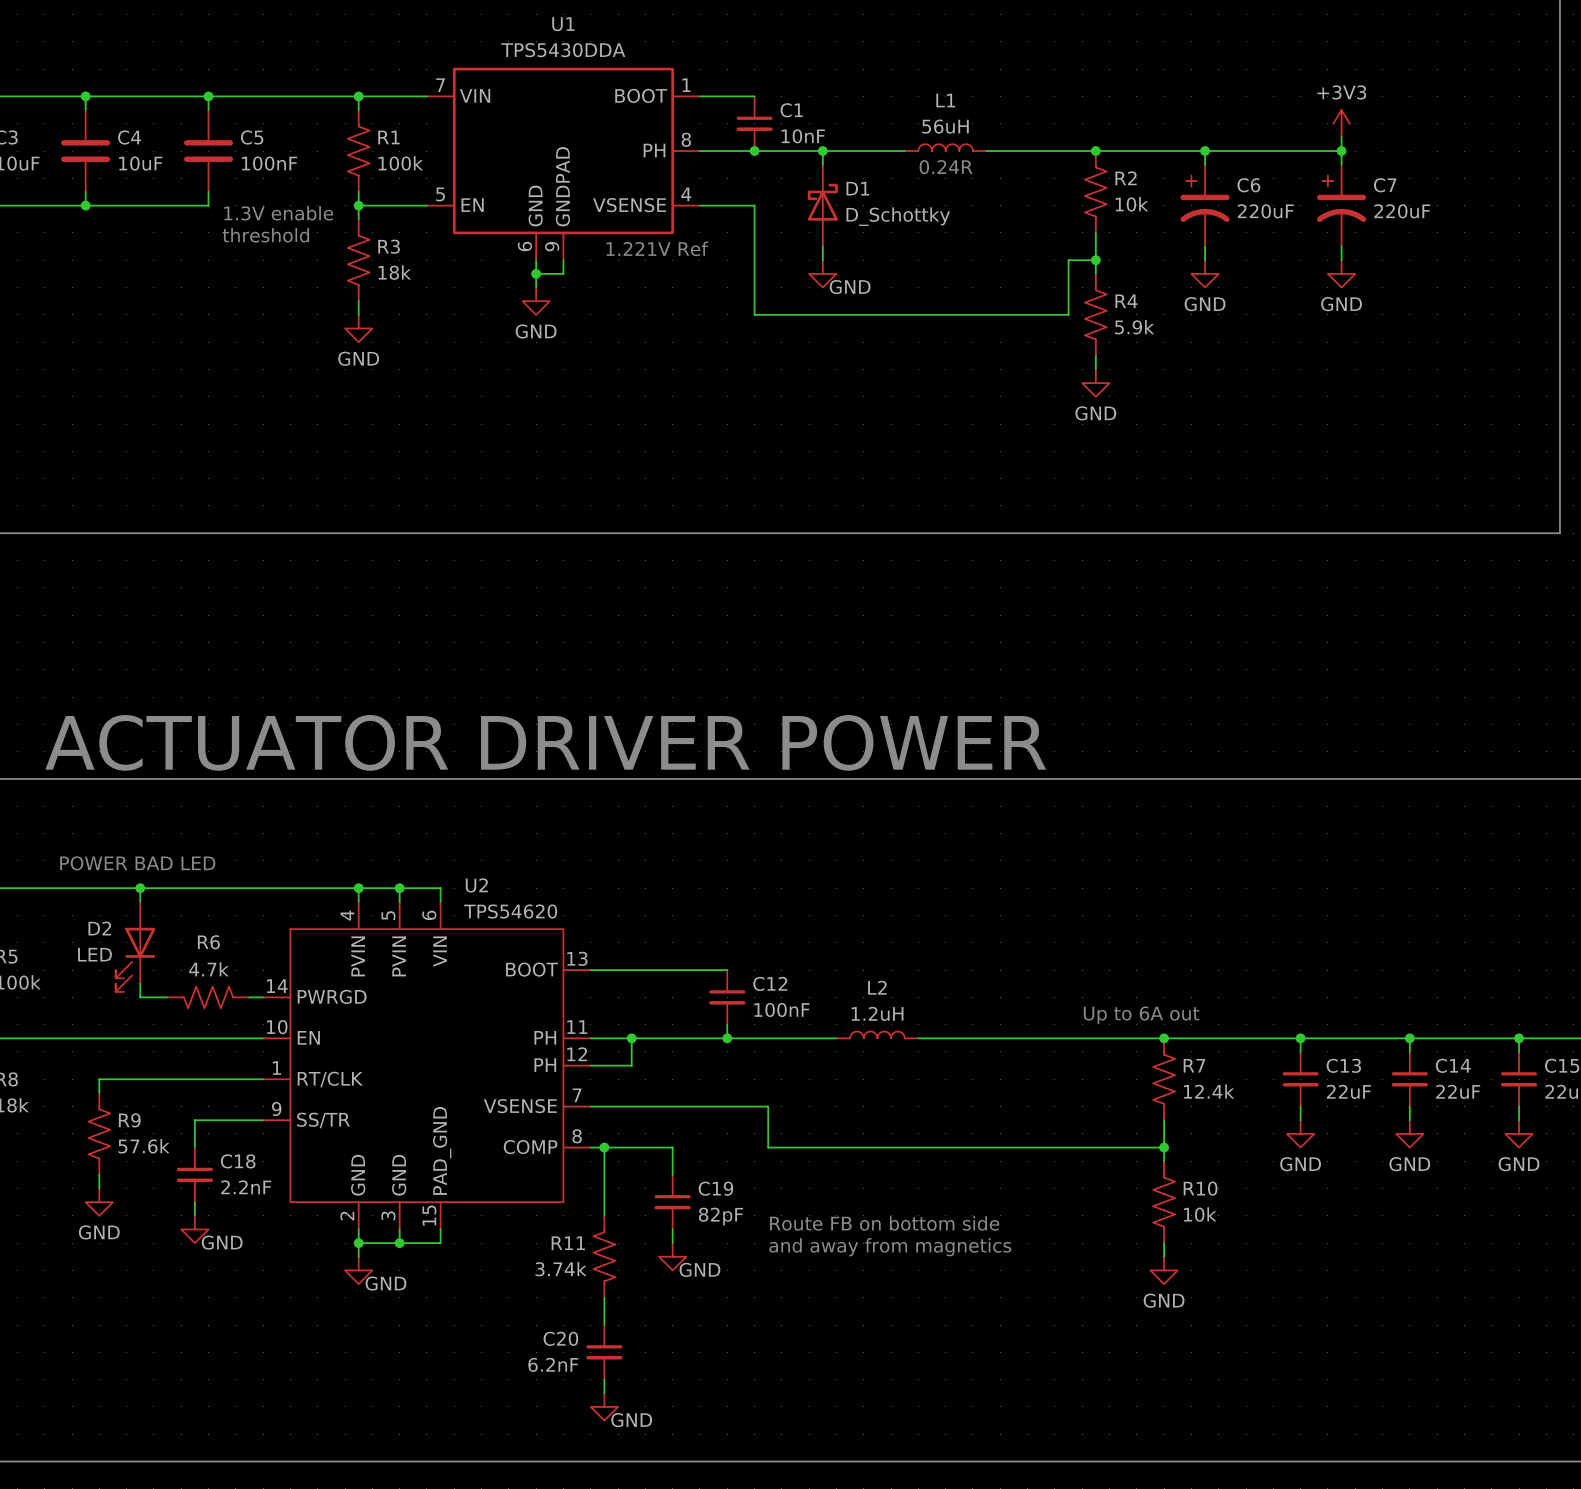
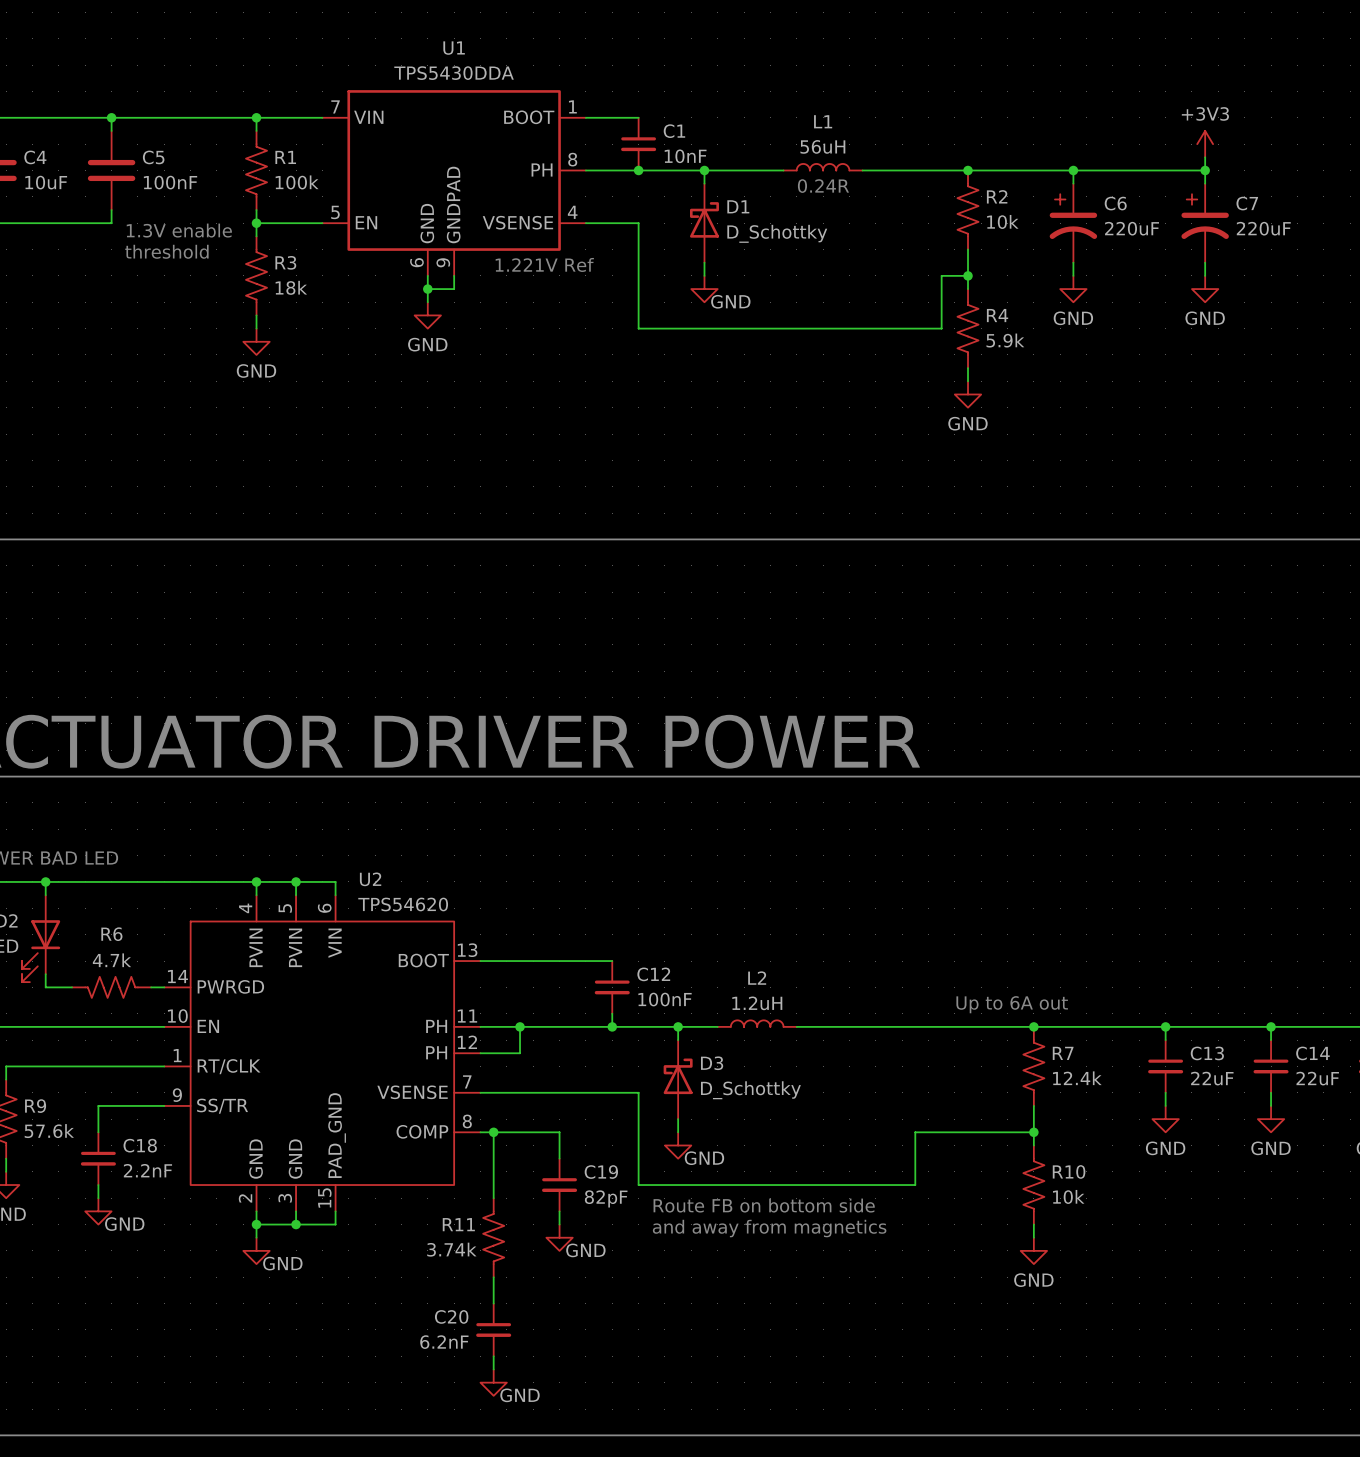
wire: none -> (678, 1026) (678, 1040)
junction: none -> (678, 1026)
D3: none -> D_Schottky (678, 1079)
wire: (754, 1106) (768, 1106) (768, 1147) (1041, 1147) -> (638, 1092) (638, 1185) (915, 1185) (915, 1132)
wire: none -> (678, 1119) (678, 1132)
power symbol: none -> GND (678, 1145)

